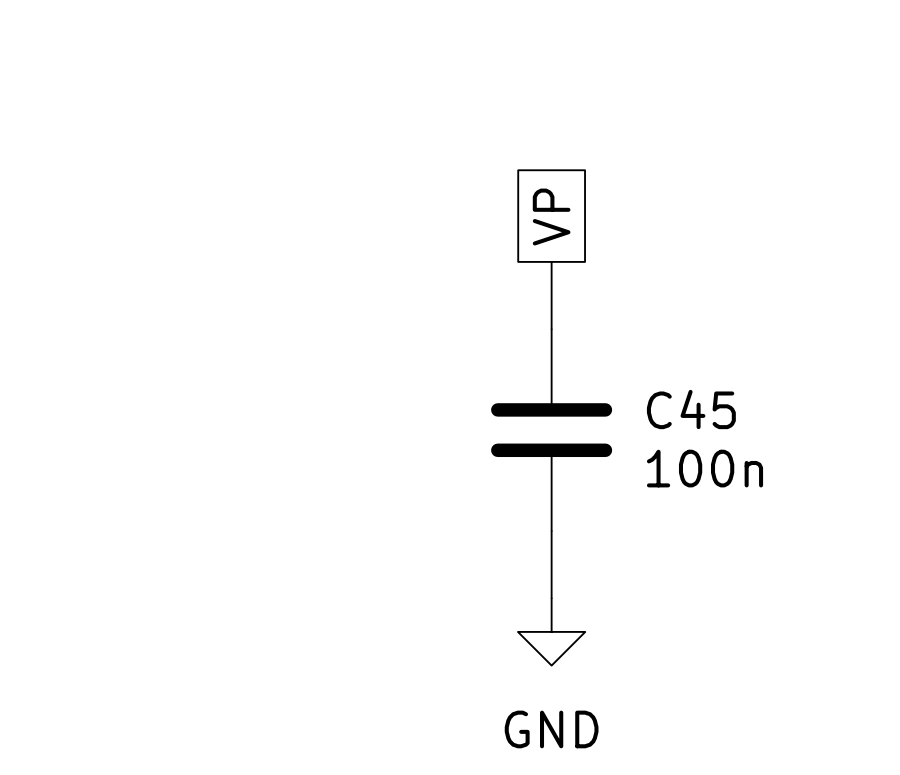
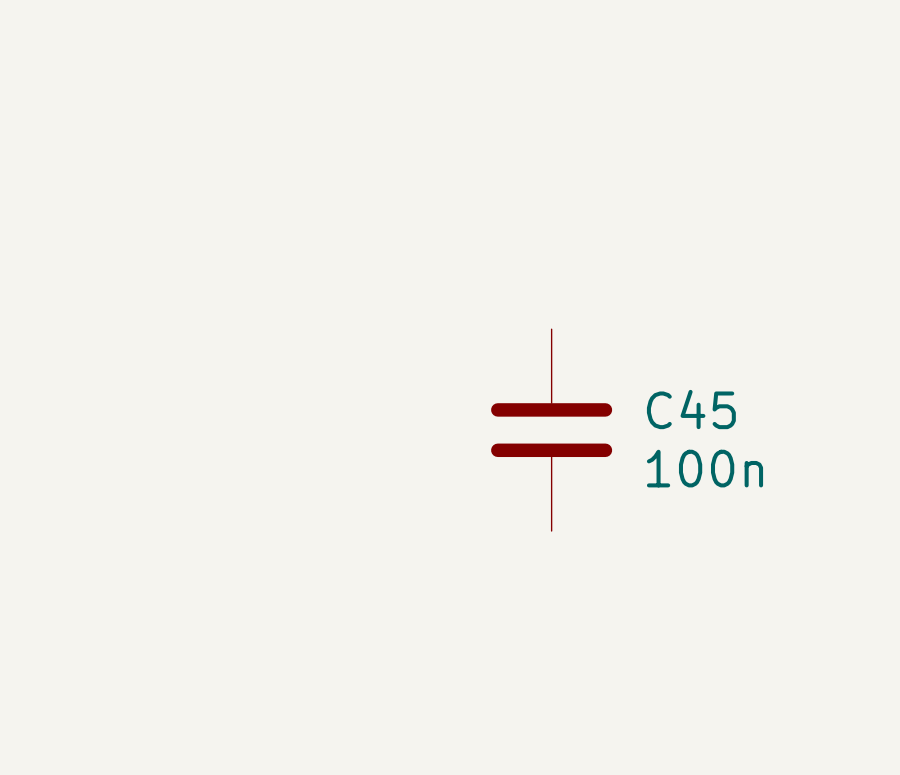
global label: VP (551, 217) -> none
wire: (551, 261) (551, 329) -> none
wire: (551, 531) (551, 598) -> none
power symbol: GND (551, 631) -> none

